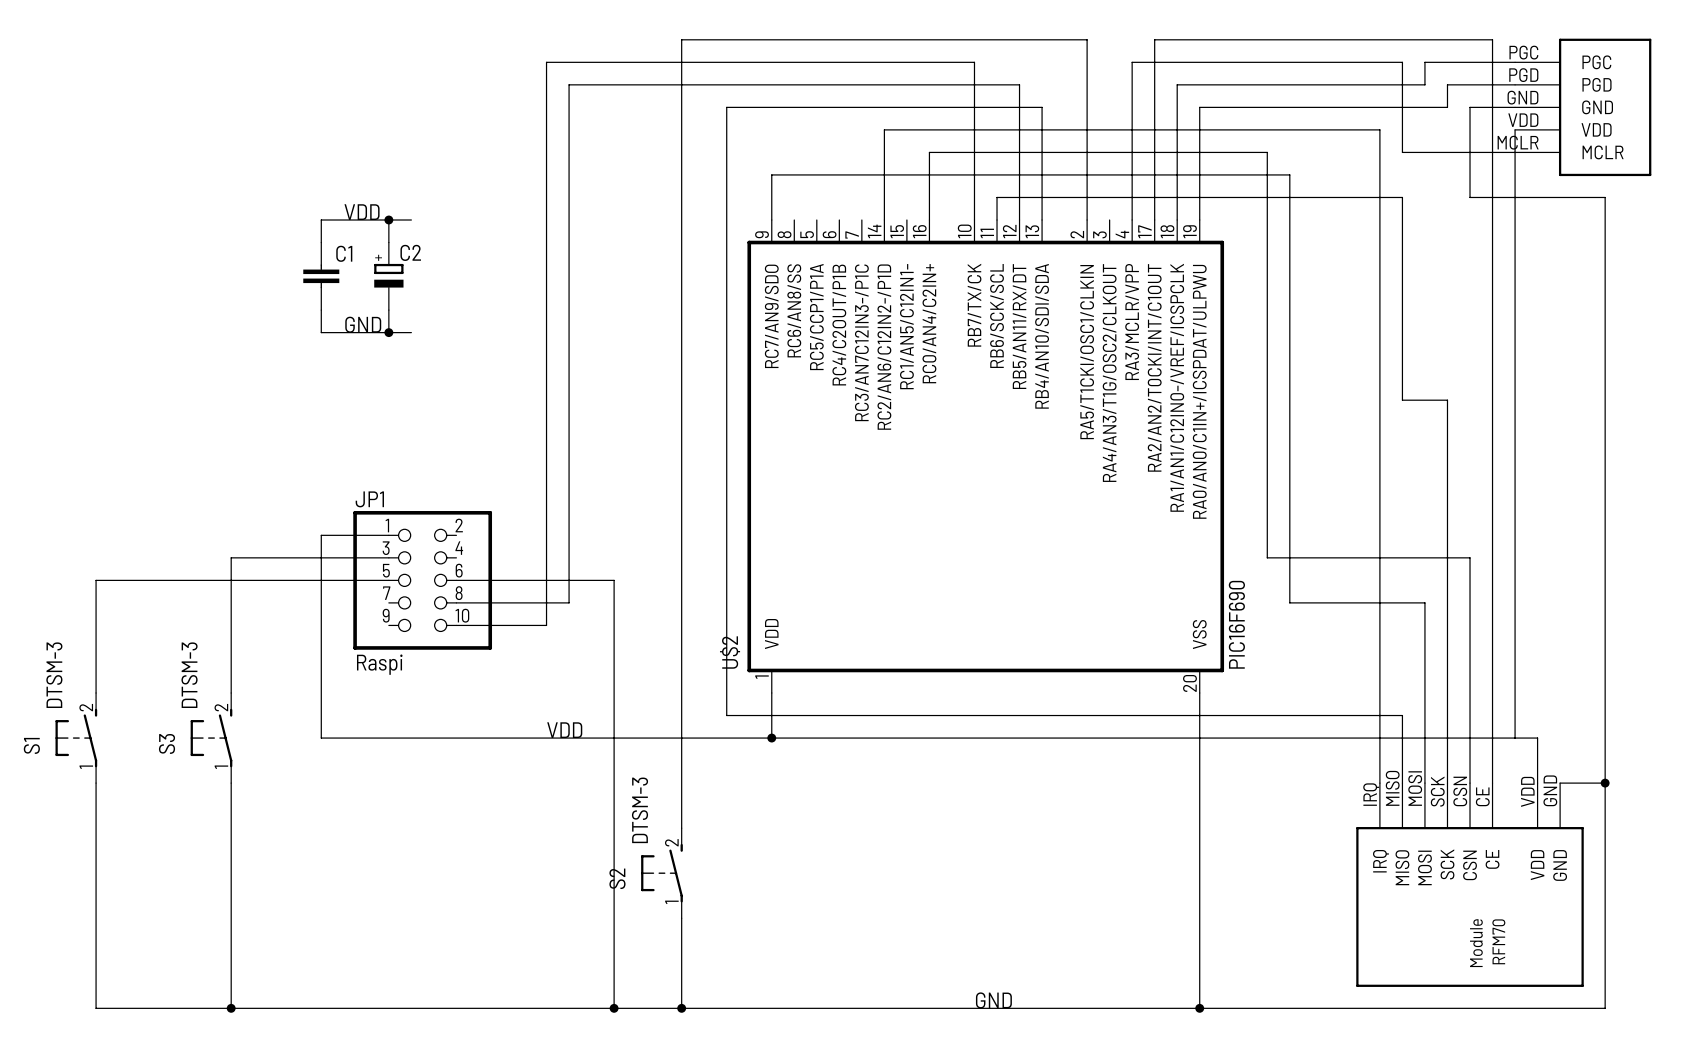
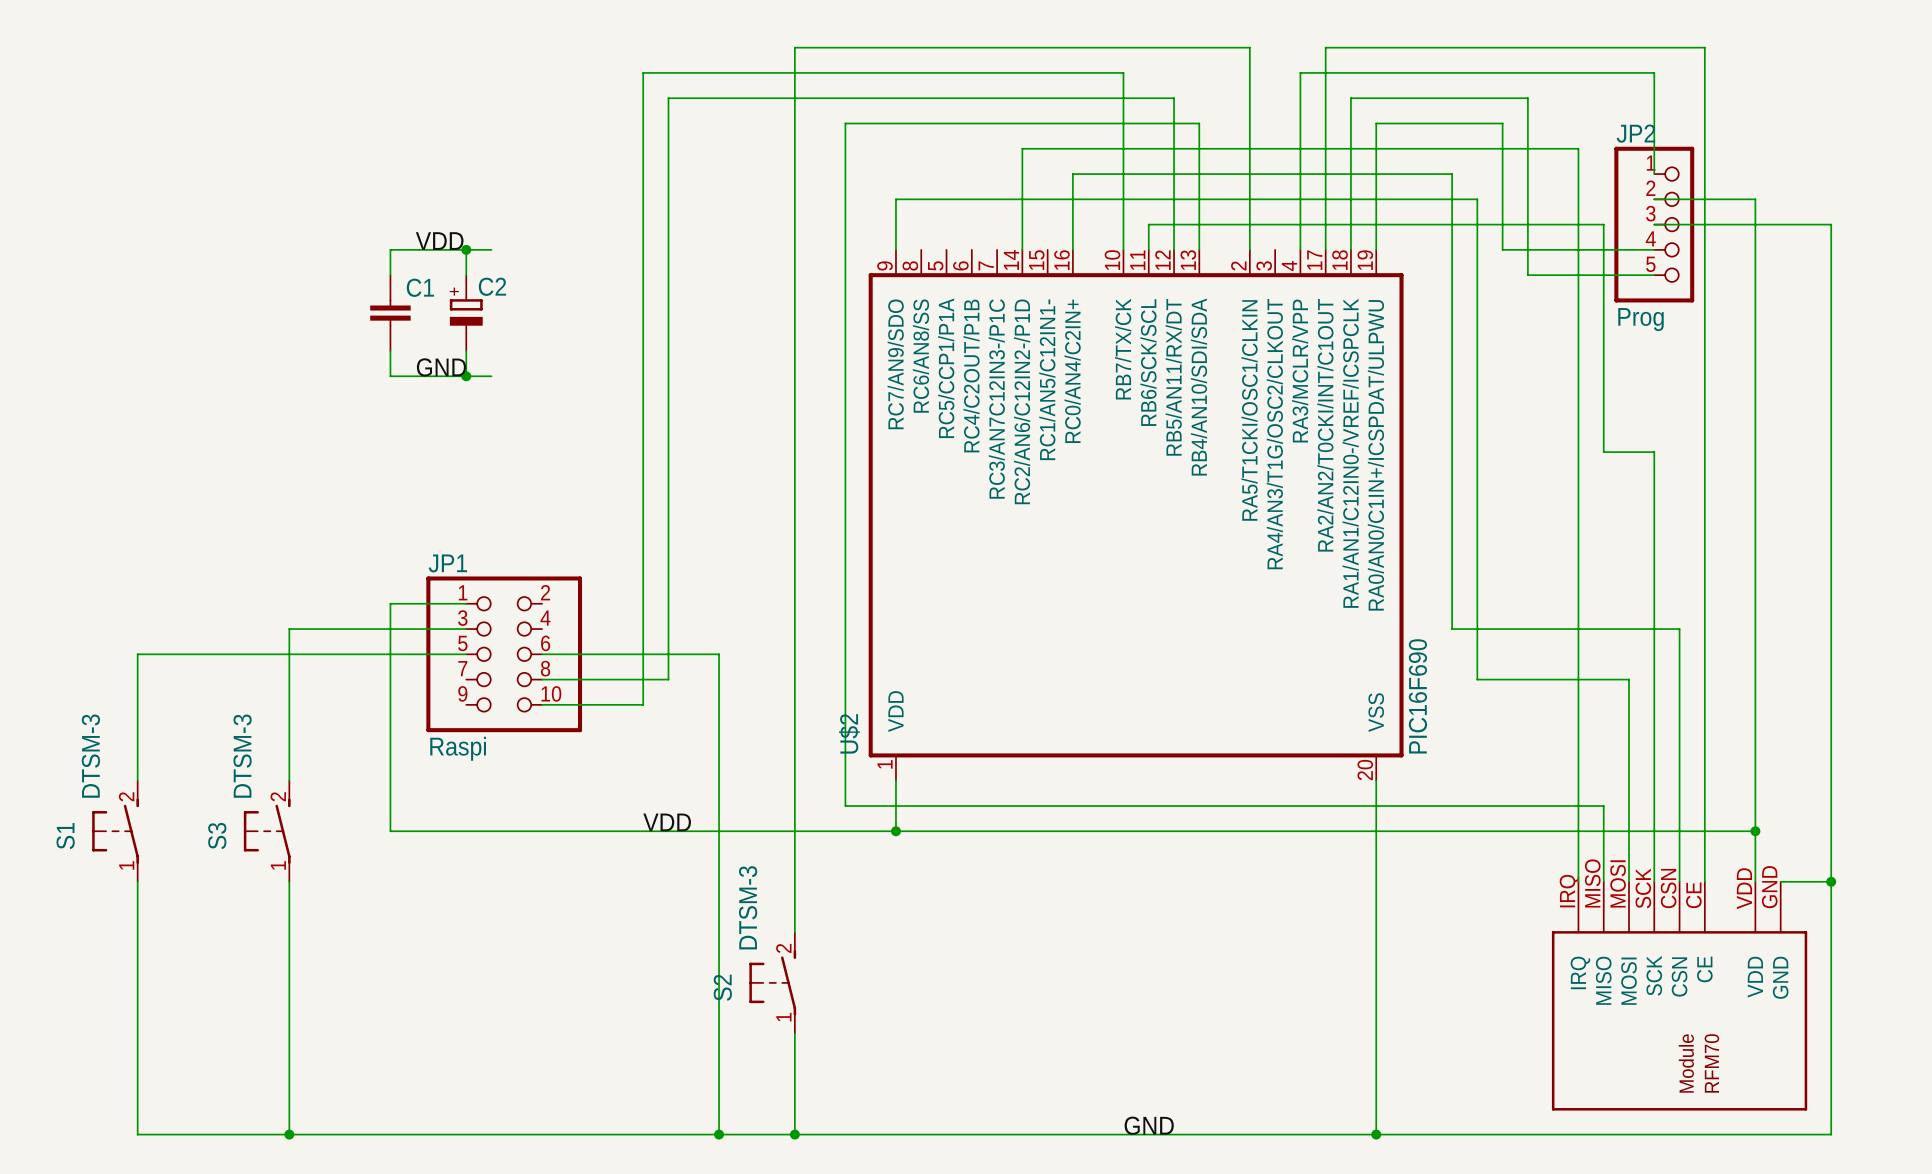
wire: (1402, 62) (1402, 152) (1515, 152) -> none
wire: (1424, 62) (1424, 84) (1334, 84) -> (1629, 72) (1603, 72)
wire: (1447, 62) (1515, 62) -> (1654, 72) (1654, 98)
wire: none -> (1527, 98) (1527, 275) (1654, 275)
wire: (1447, 84) (1515, 84) -> none
wire: (1312, 107) (1447, 107) -> (1502, 123) (1502, 249) (1654, 249)
wire: none -> (1654, 123) (1654, 174)
wire: (1515, 107) (1470, 107) (1470, 197) -> (1654, 224) (1679, 224)
part: (1583, 107) -> none
wire: (1515, 129) (1515, 738) -> none
wire: none -> (1654, 199) (1755, 199) (1755, 831)
JP2: none -> Prog (1654, 224)
junction: none -> (1755, 831)

